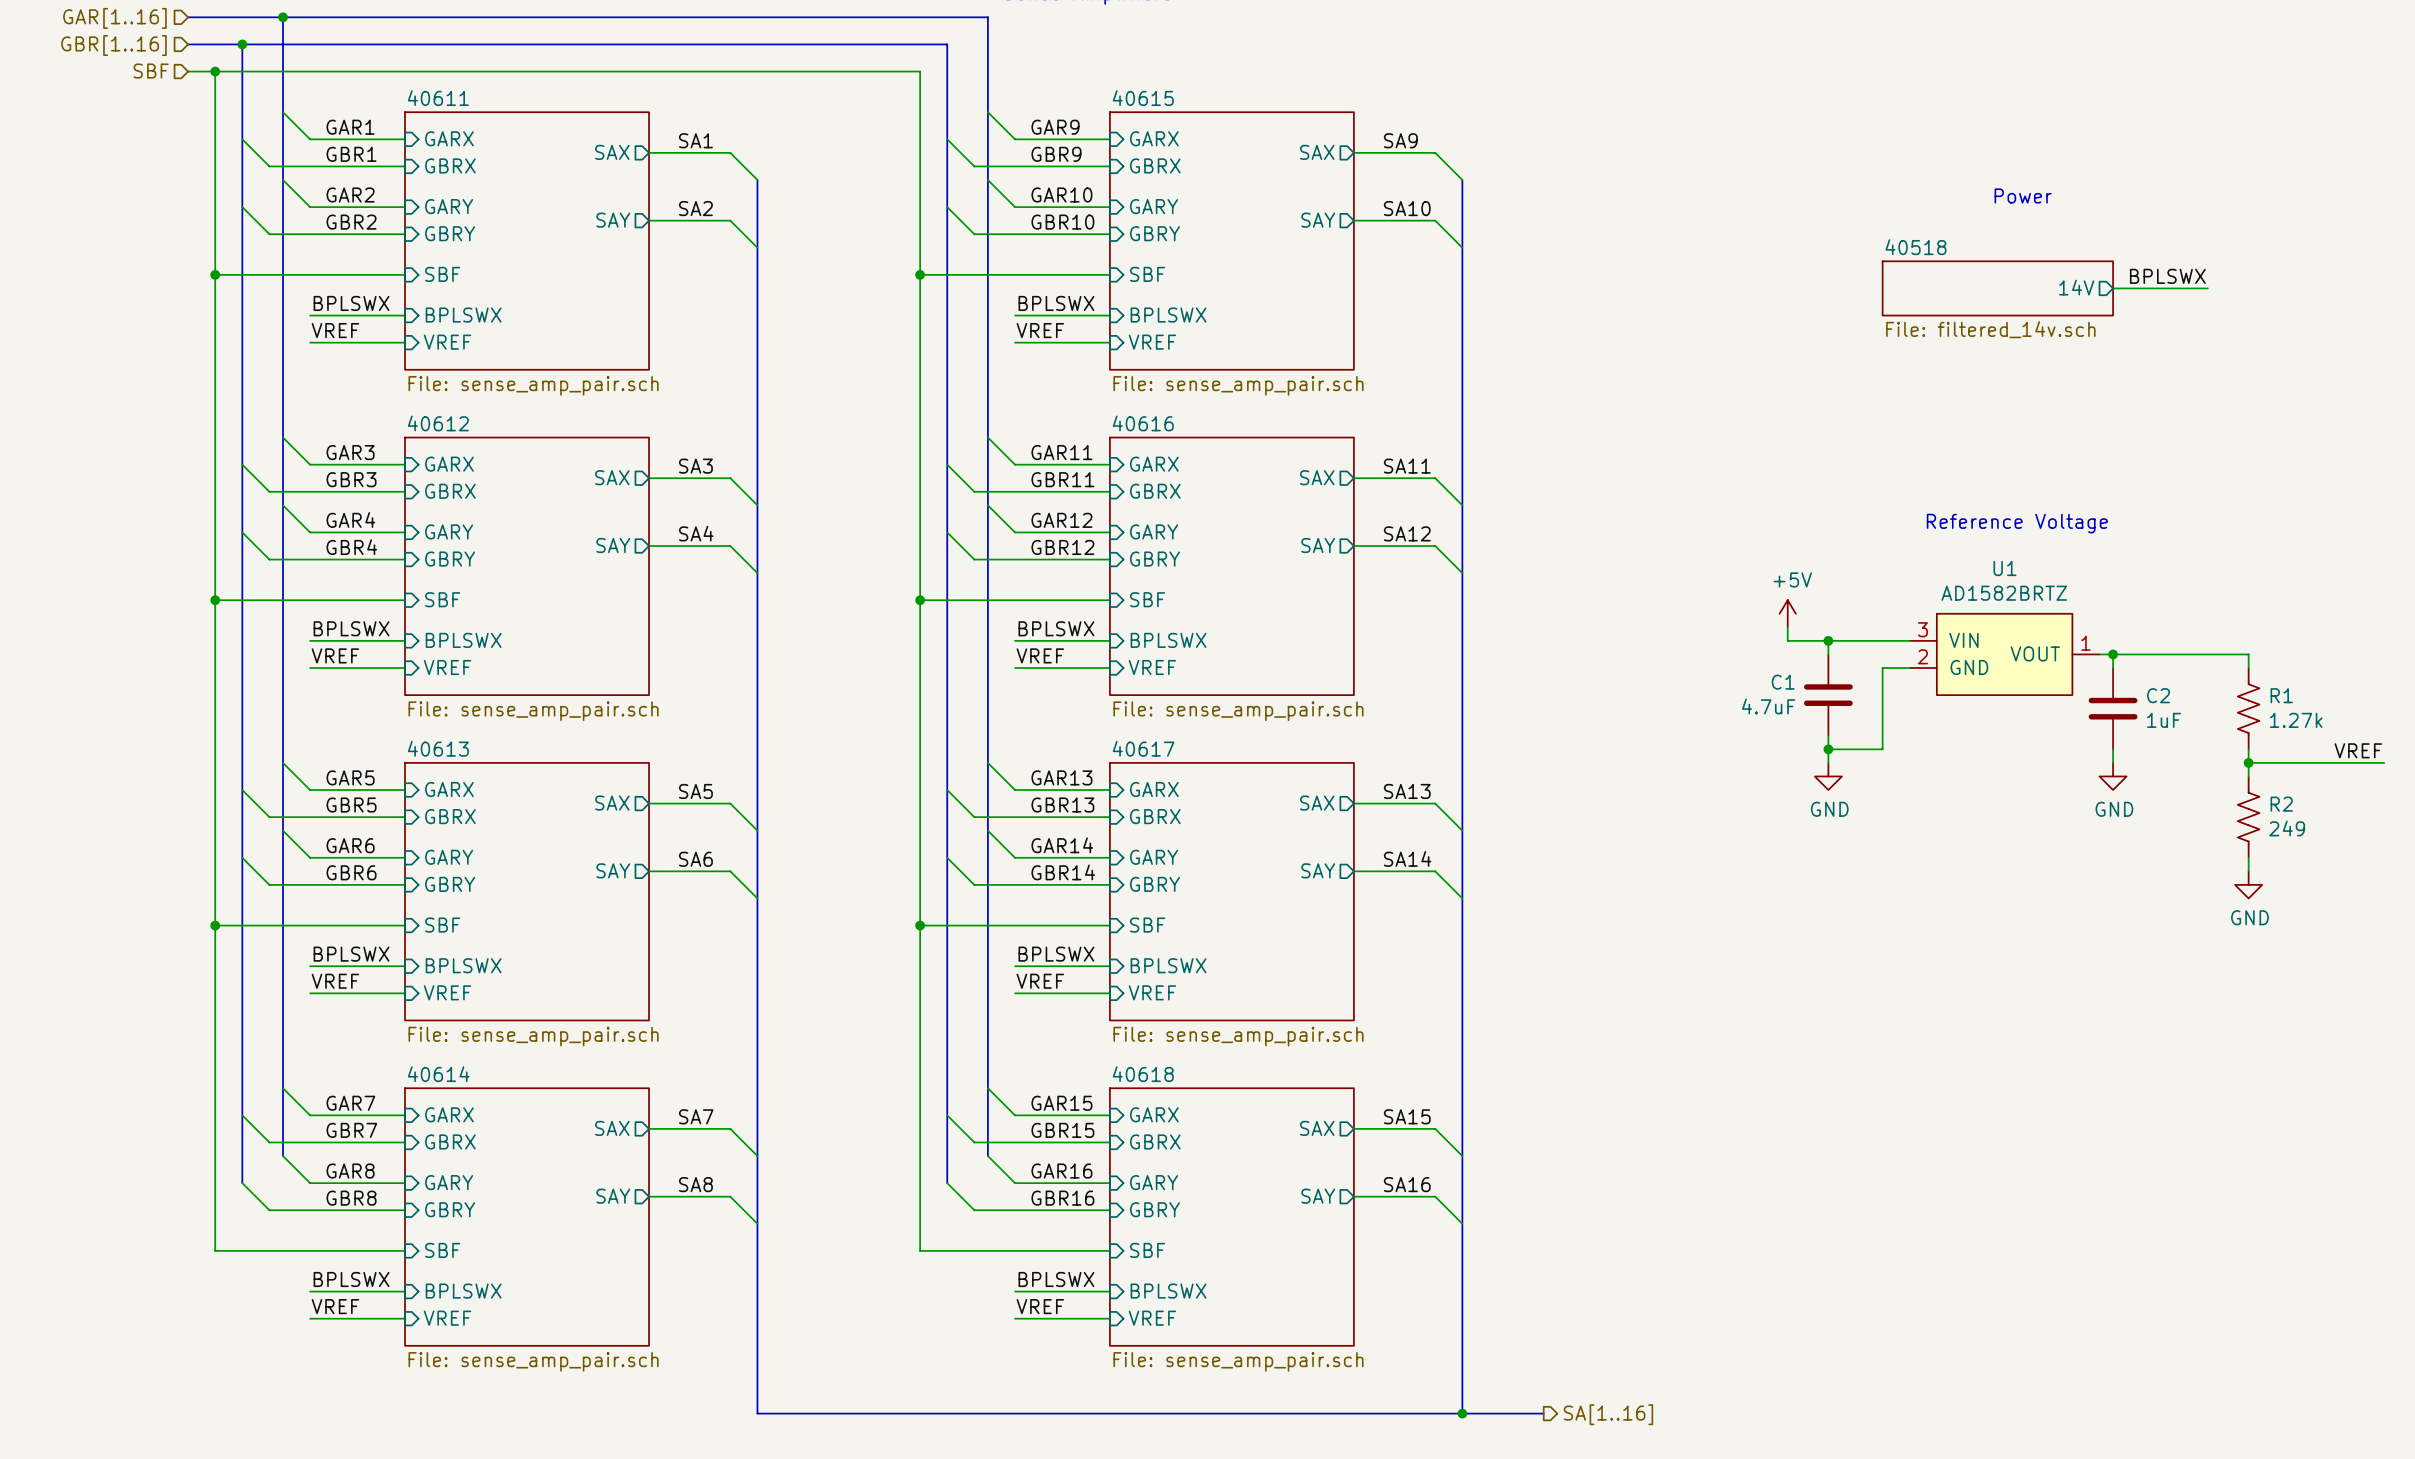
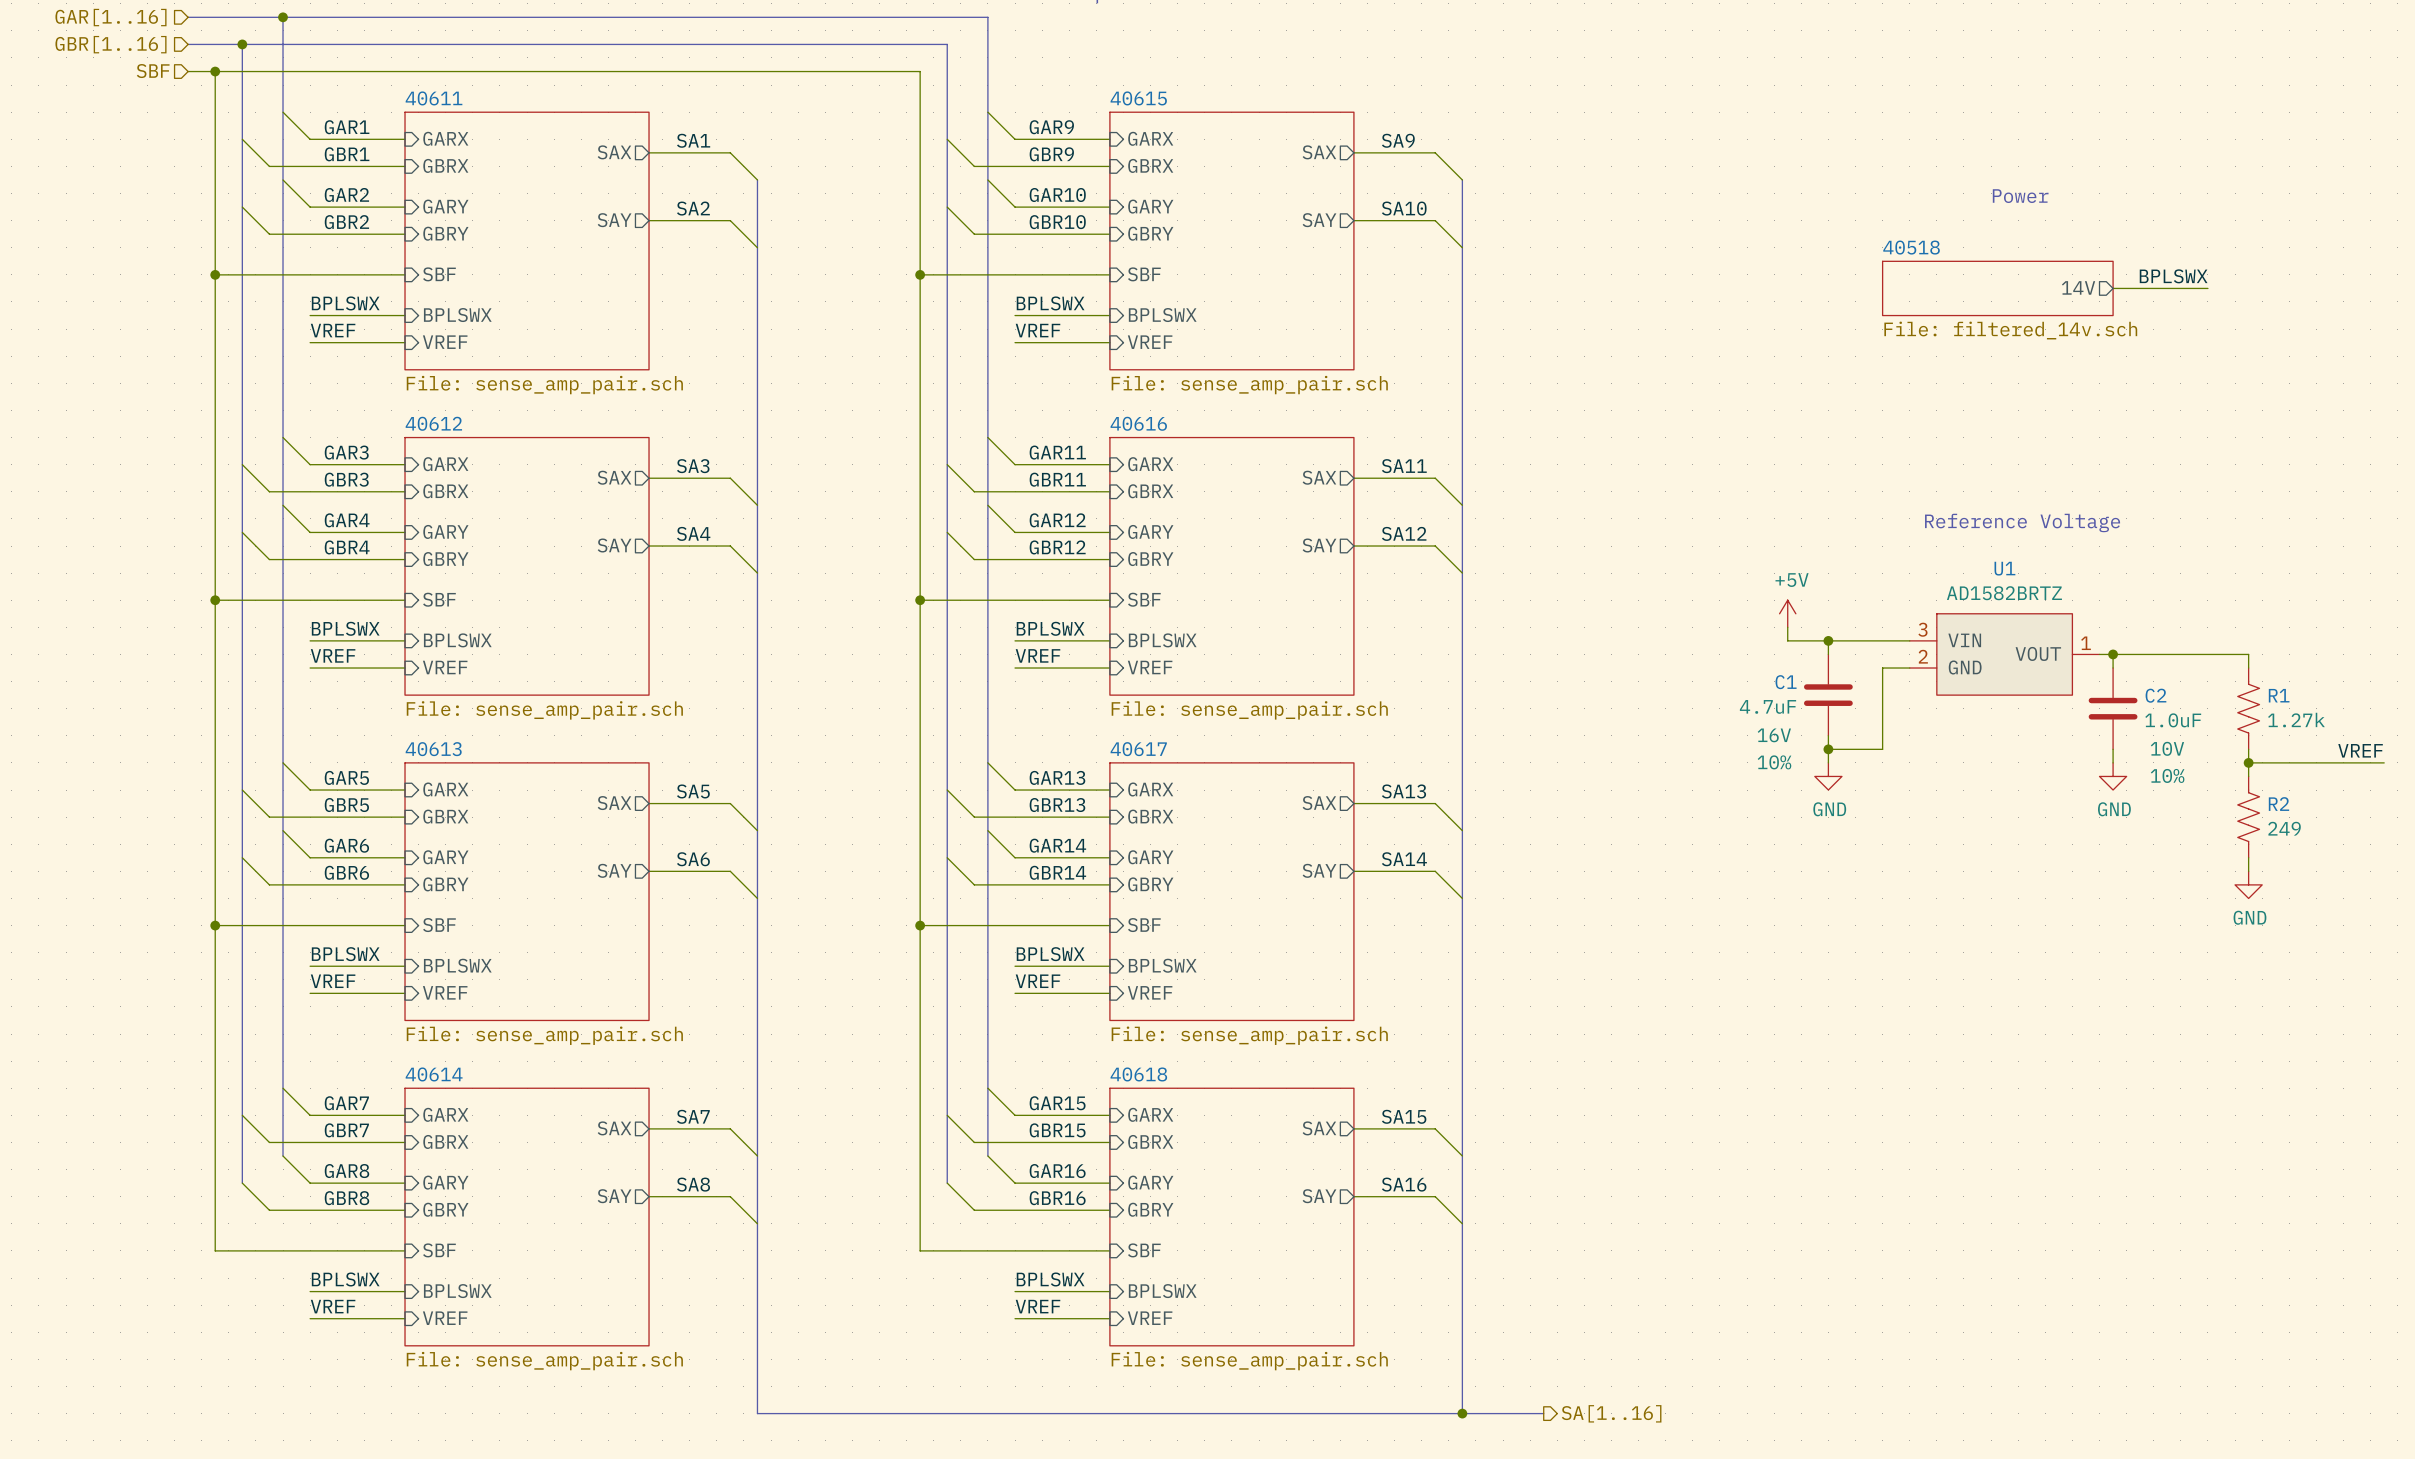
C2 value: 1uF (2164, 720) -> 1.0uF (2173, 720)
C1 text: none -> 16V (1774, 735)
C2 text: none -> 10V (2167, 748)
C1 text: none -> 10% (1774, 762)
C2 text: none -> 10% (2167, 775)

